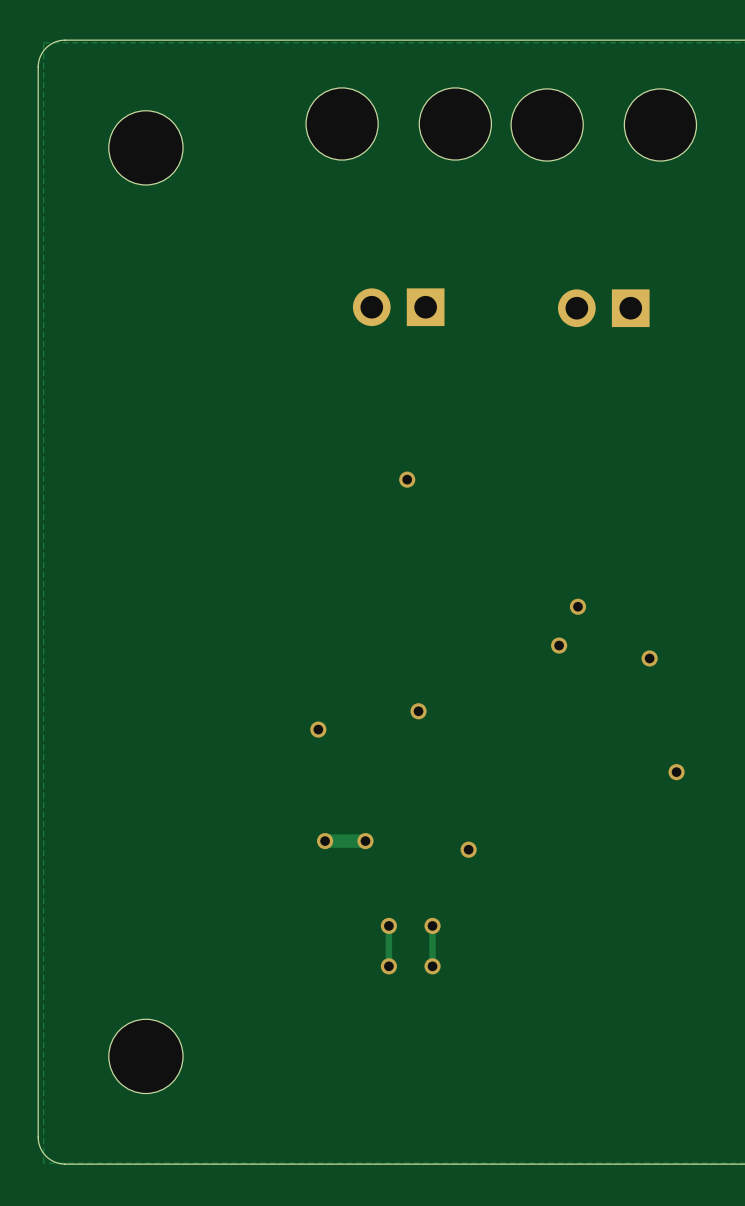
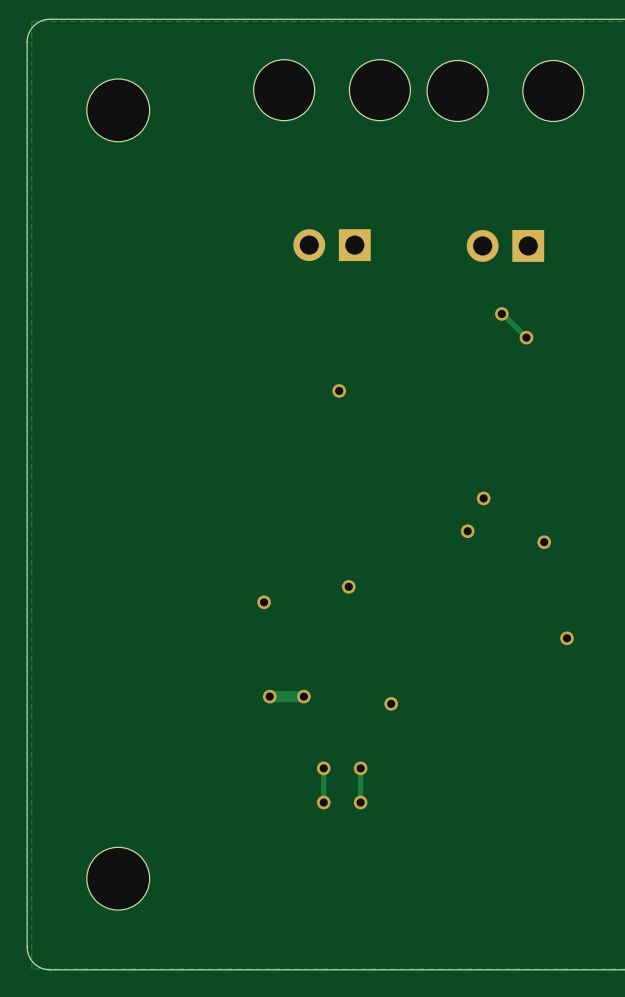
track: none -> (501, 313) (526, 337)
via: none -> (501, 313)
via: none -> (526, 337)

